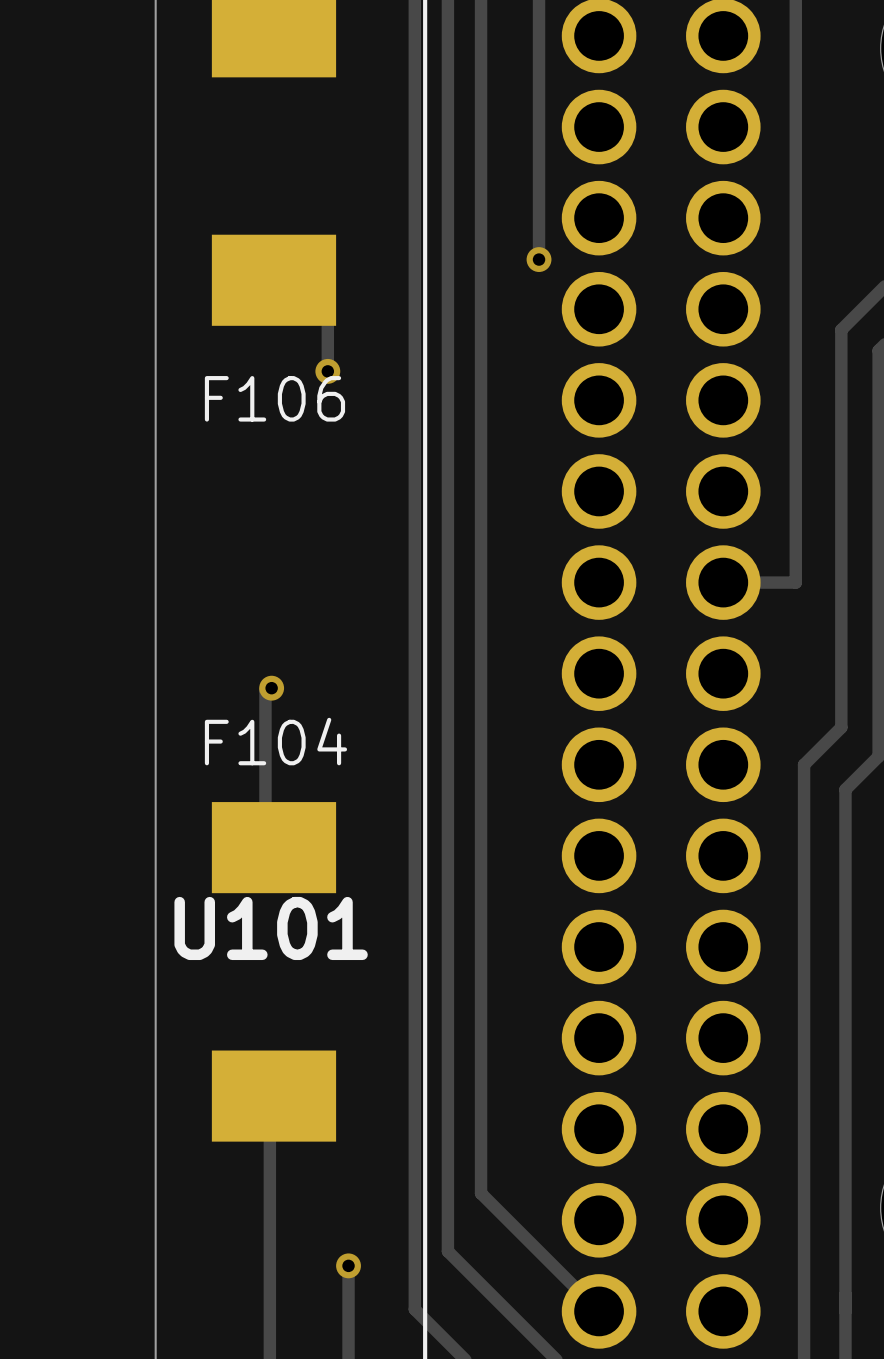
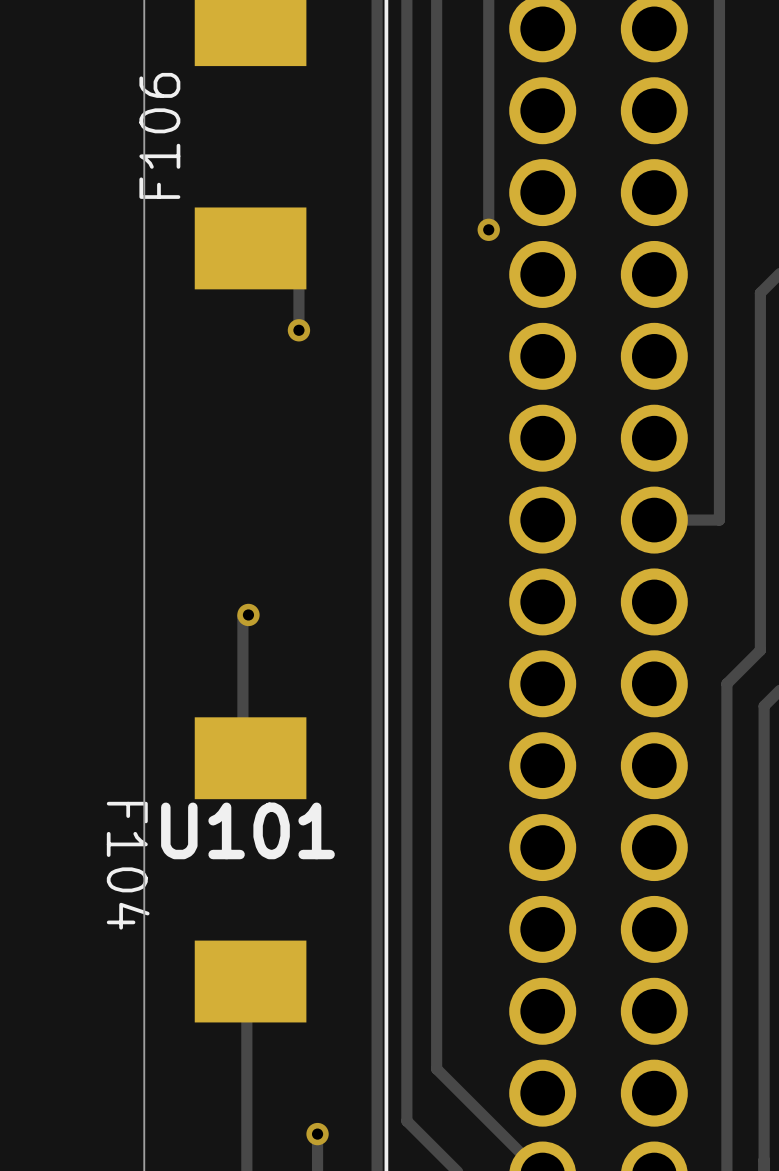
F106 name rotation: 0° (274, 398) -> 90° counterclockwise (159, 135)
F106 name position: F106 (274, 398) -> F106 (159, 135)
F104 name rotation: 0° (275, 741) -> 90° clockwise (128, 865)
F104 name position: F104 (275, 741) -> F104 (128, 865)

